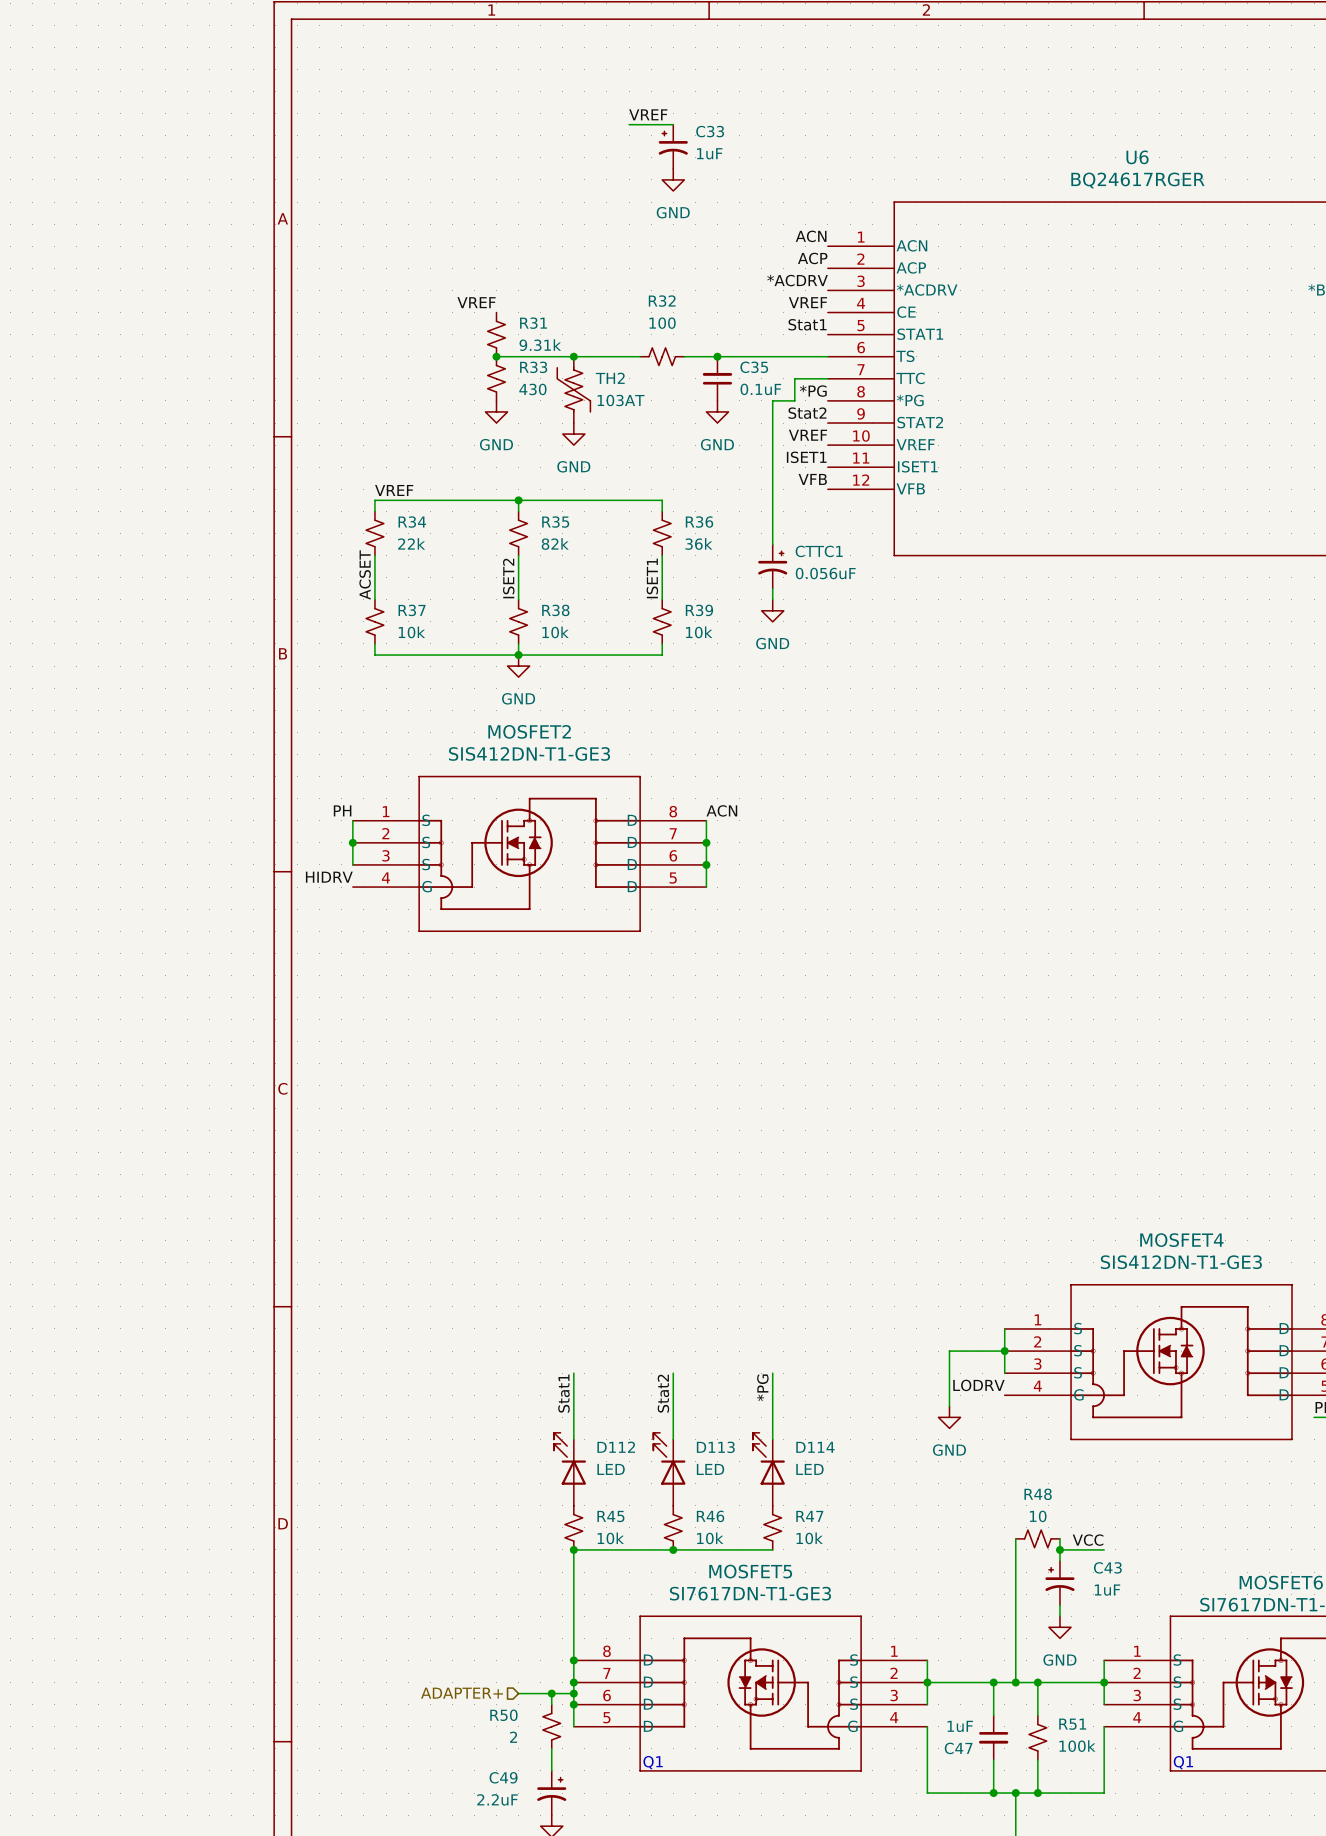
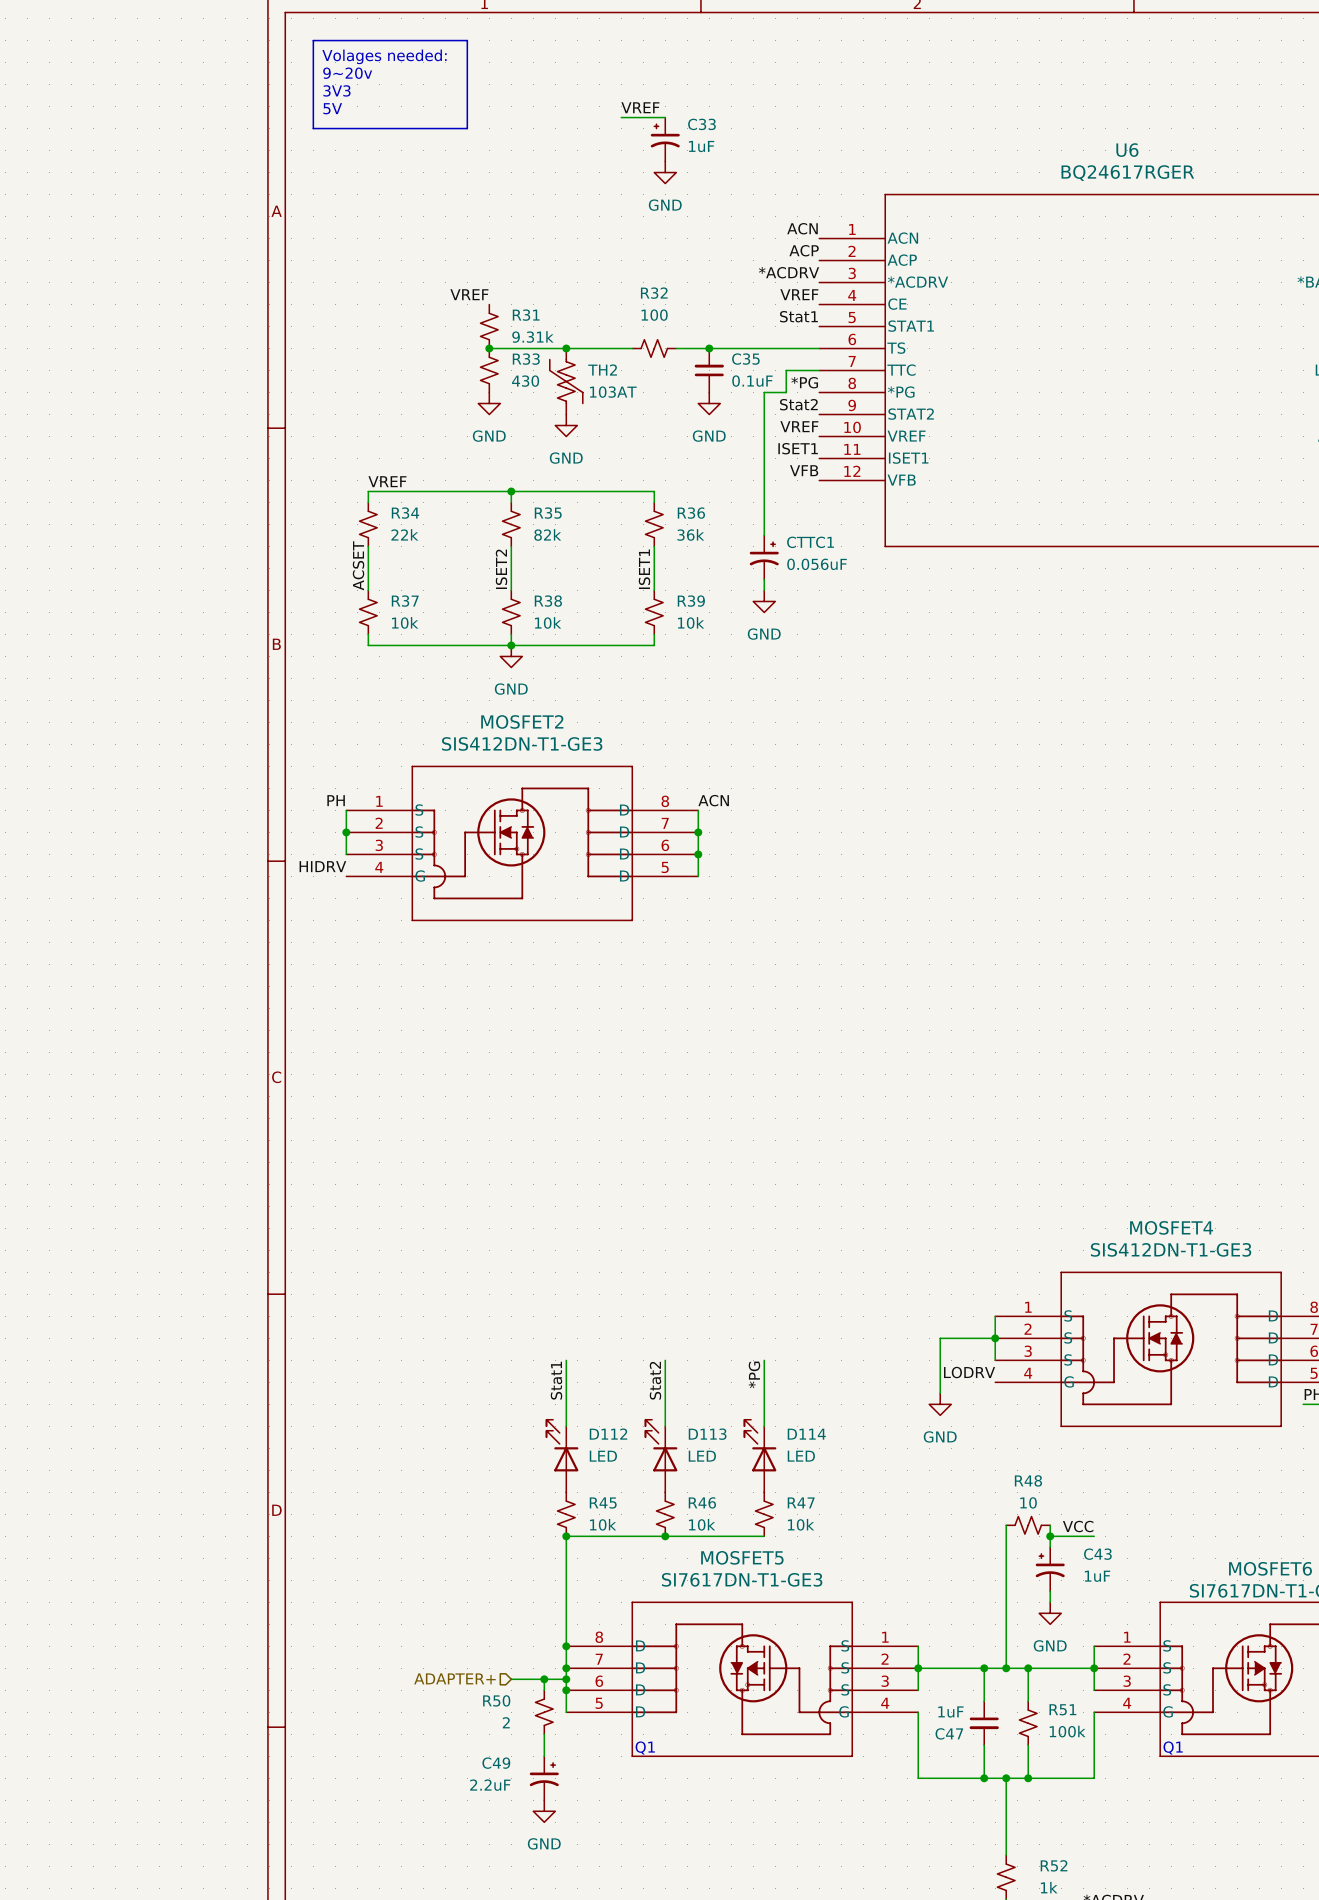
line: none -> (313, 40) (467, 40) (467, 128) (313, 128) (313, 40)
text: none -> Volages needed: (384, 56)
text: none -> 9~20v (347, 73)
text: none -> 3V3 (336, 90)
text: none -> 5V (332, 108)

